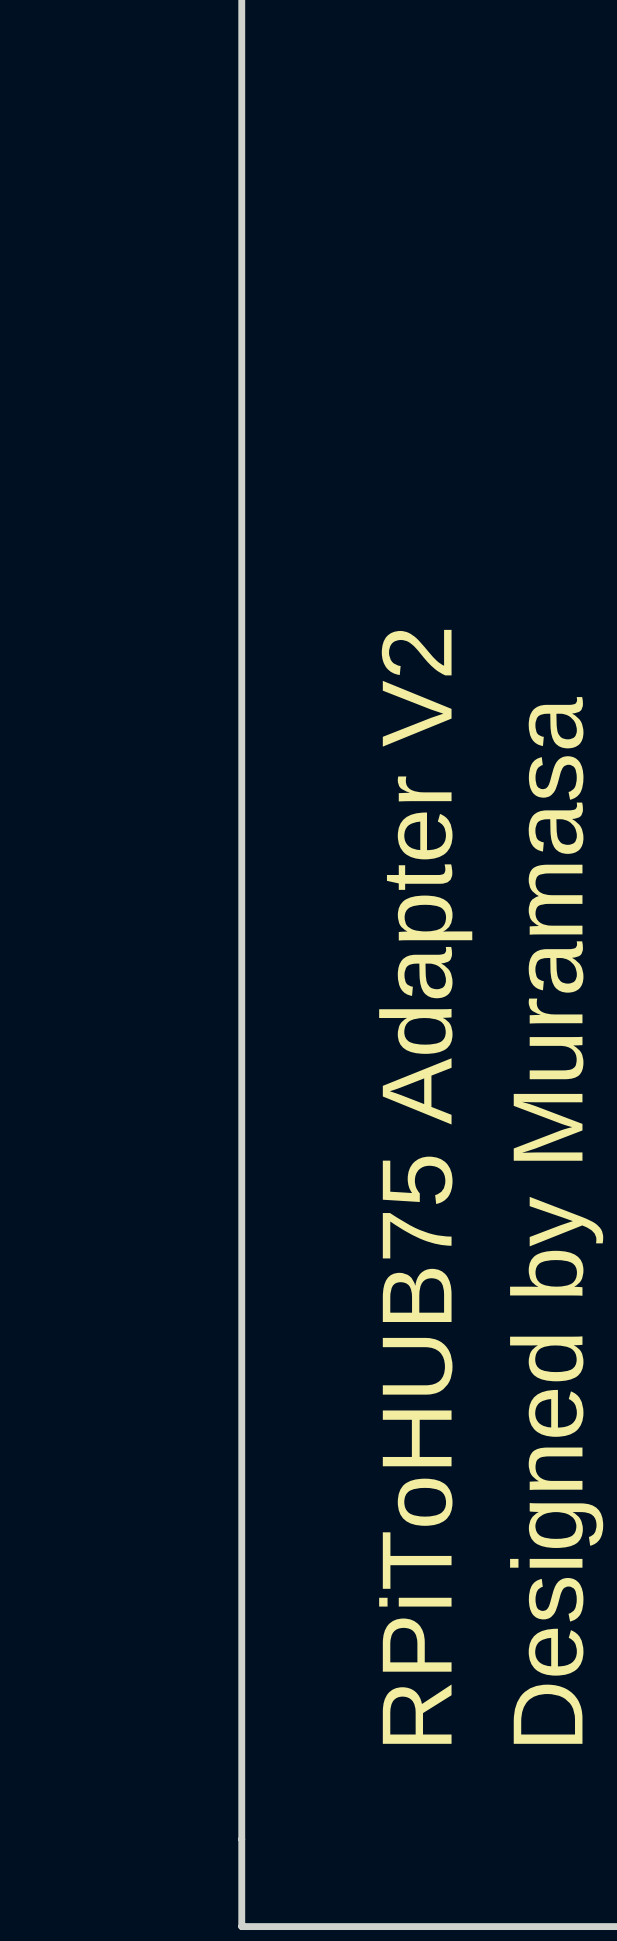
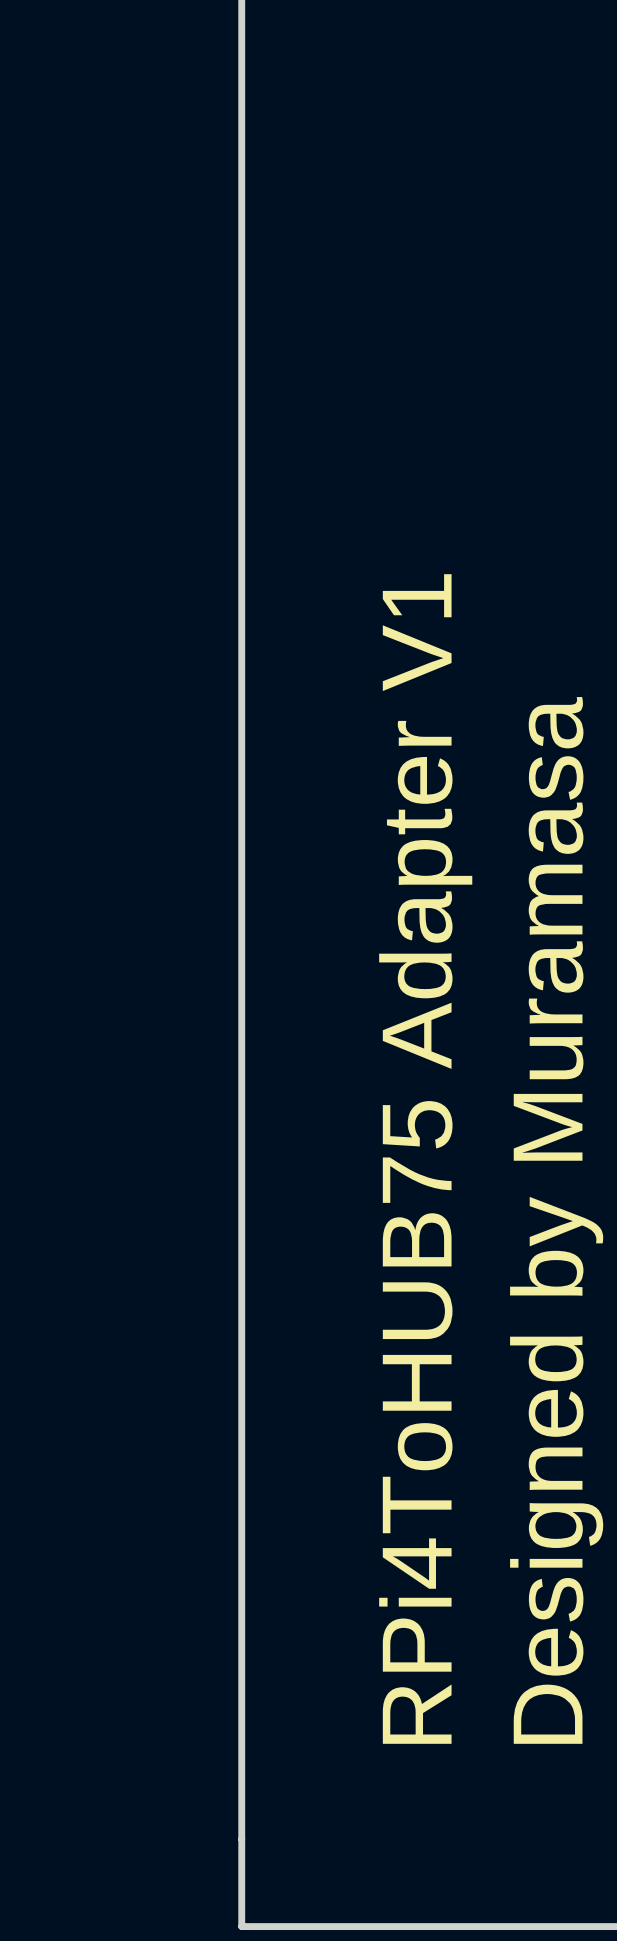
text: RPiToHUB75 Adapter V2 (425, 1186) -> RPi4ToHUB75 Adapter V1 (425, 1159)

